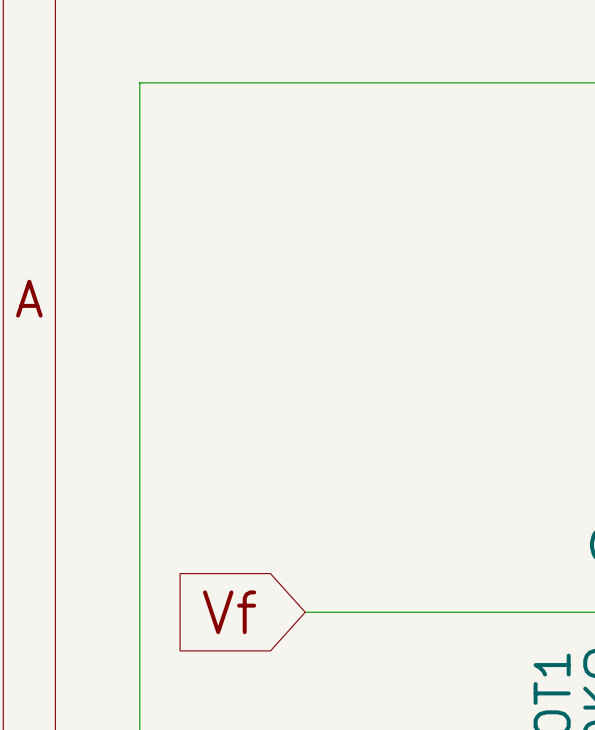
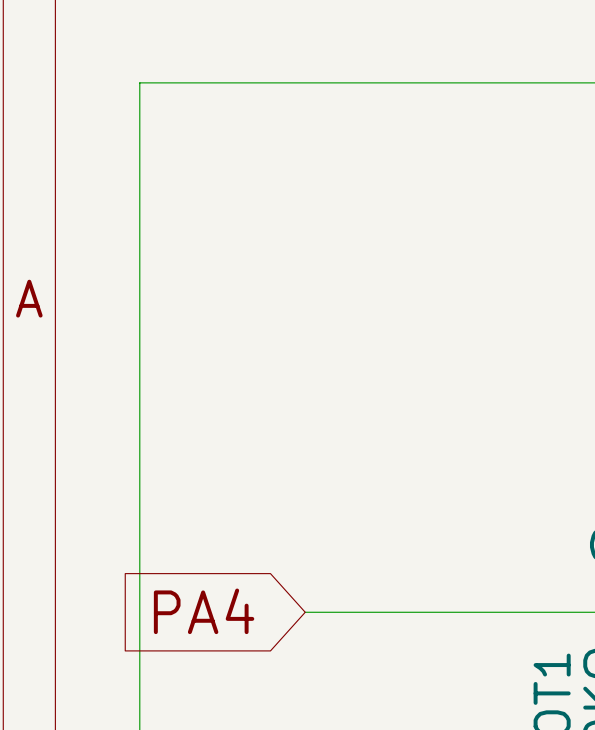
global label: Vf (229, 612) -> PA4 (204, 611)

